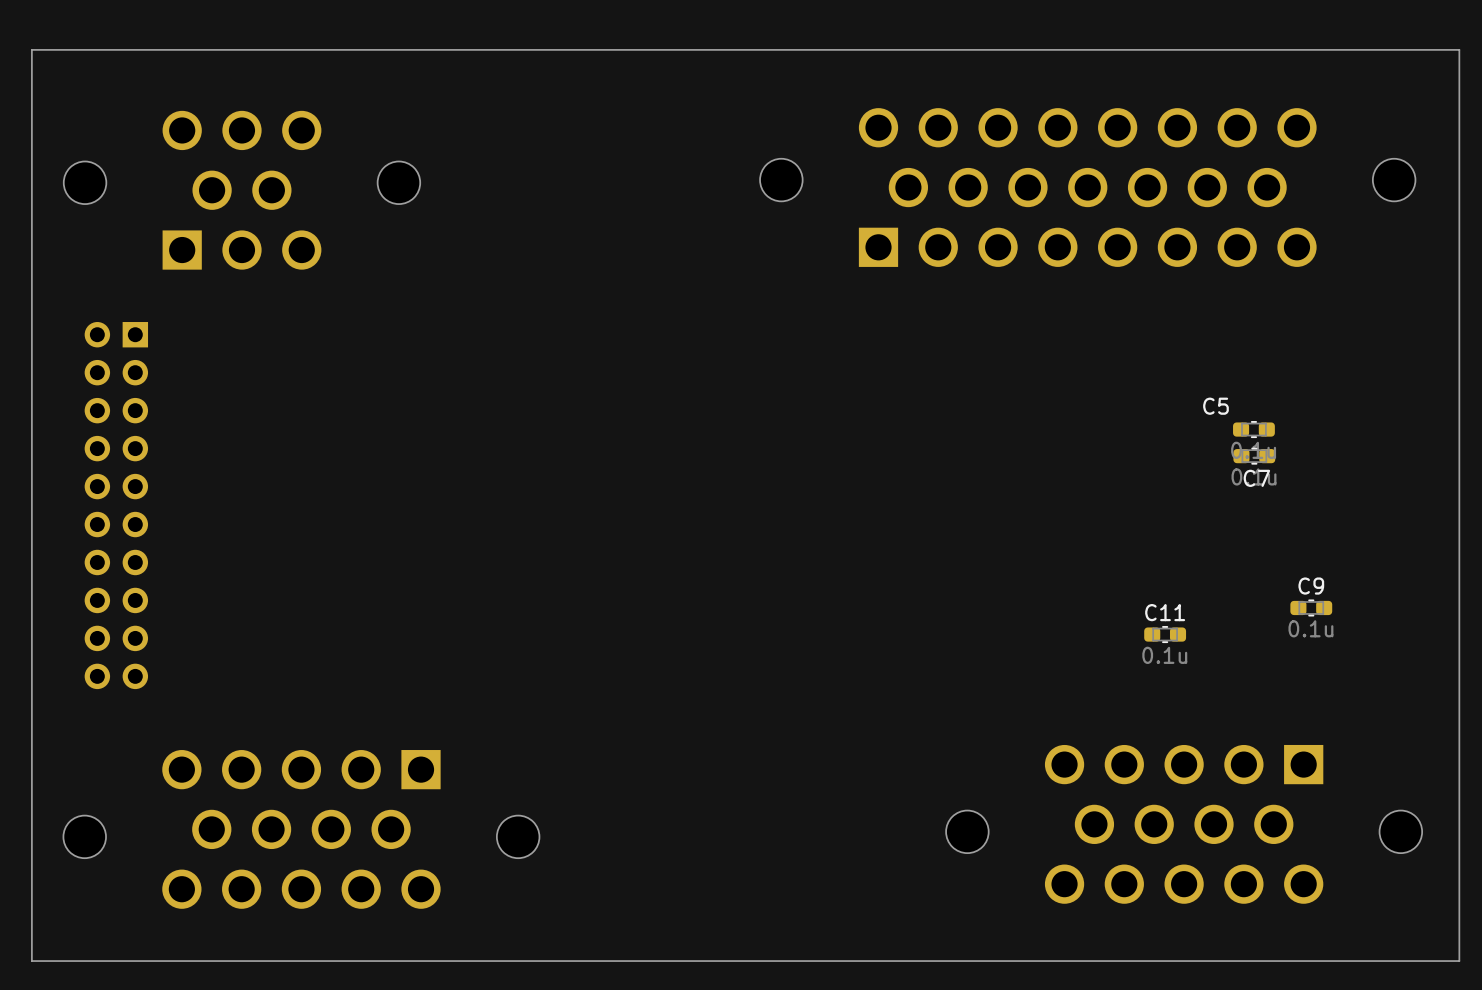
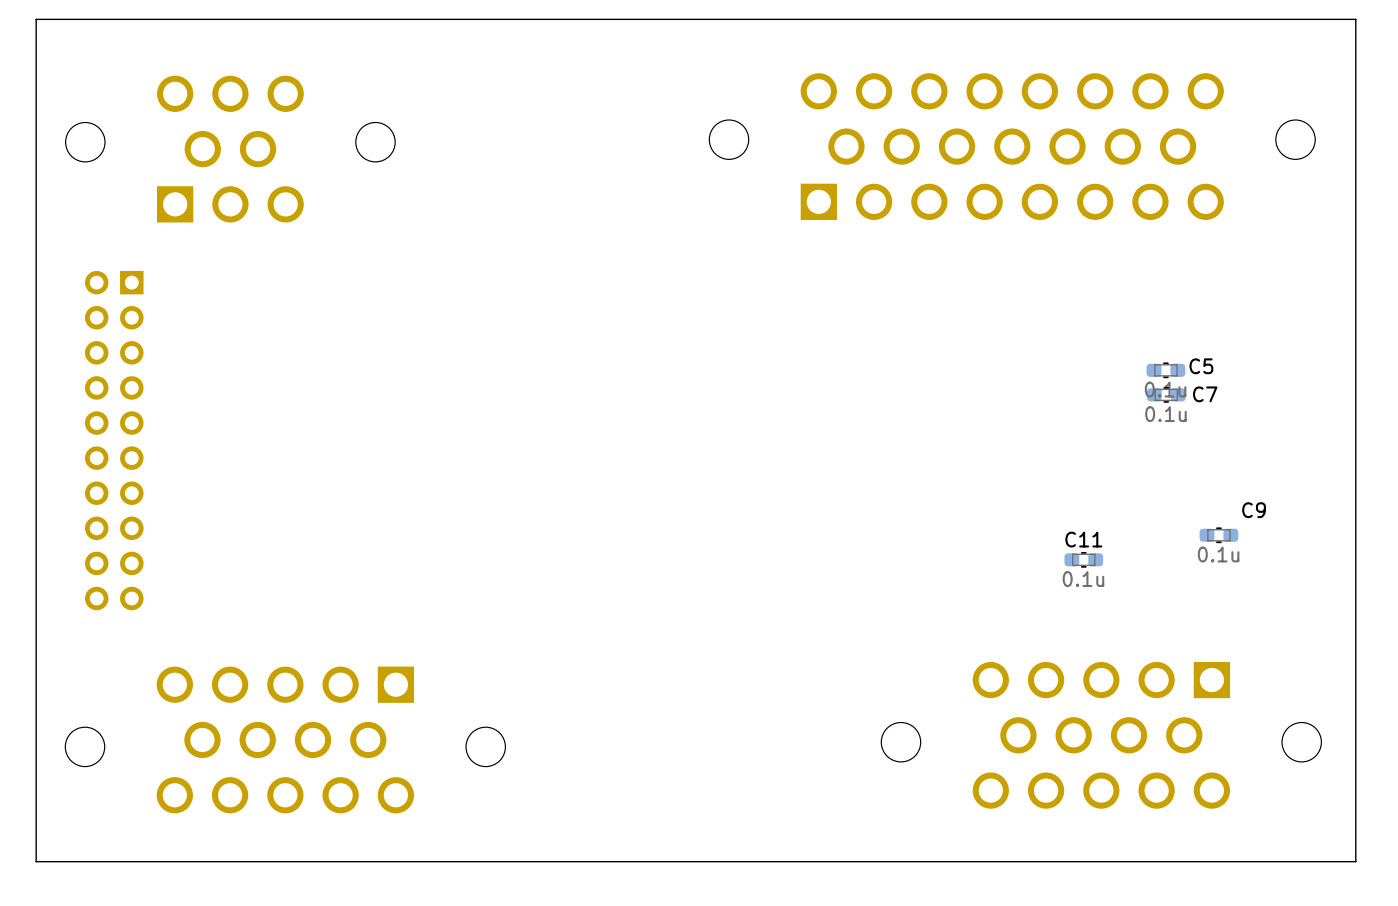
C5 name position: C5 (1215, 406) -> C5 (1201, 366)
C7 name position: C7 (1256, 478) -> C7 (1205, 394)
C9 name position: C9 (1311, 586) -> C9 (1254, 510)

